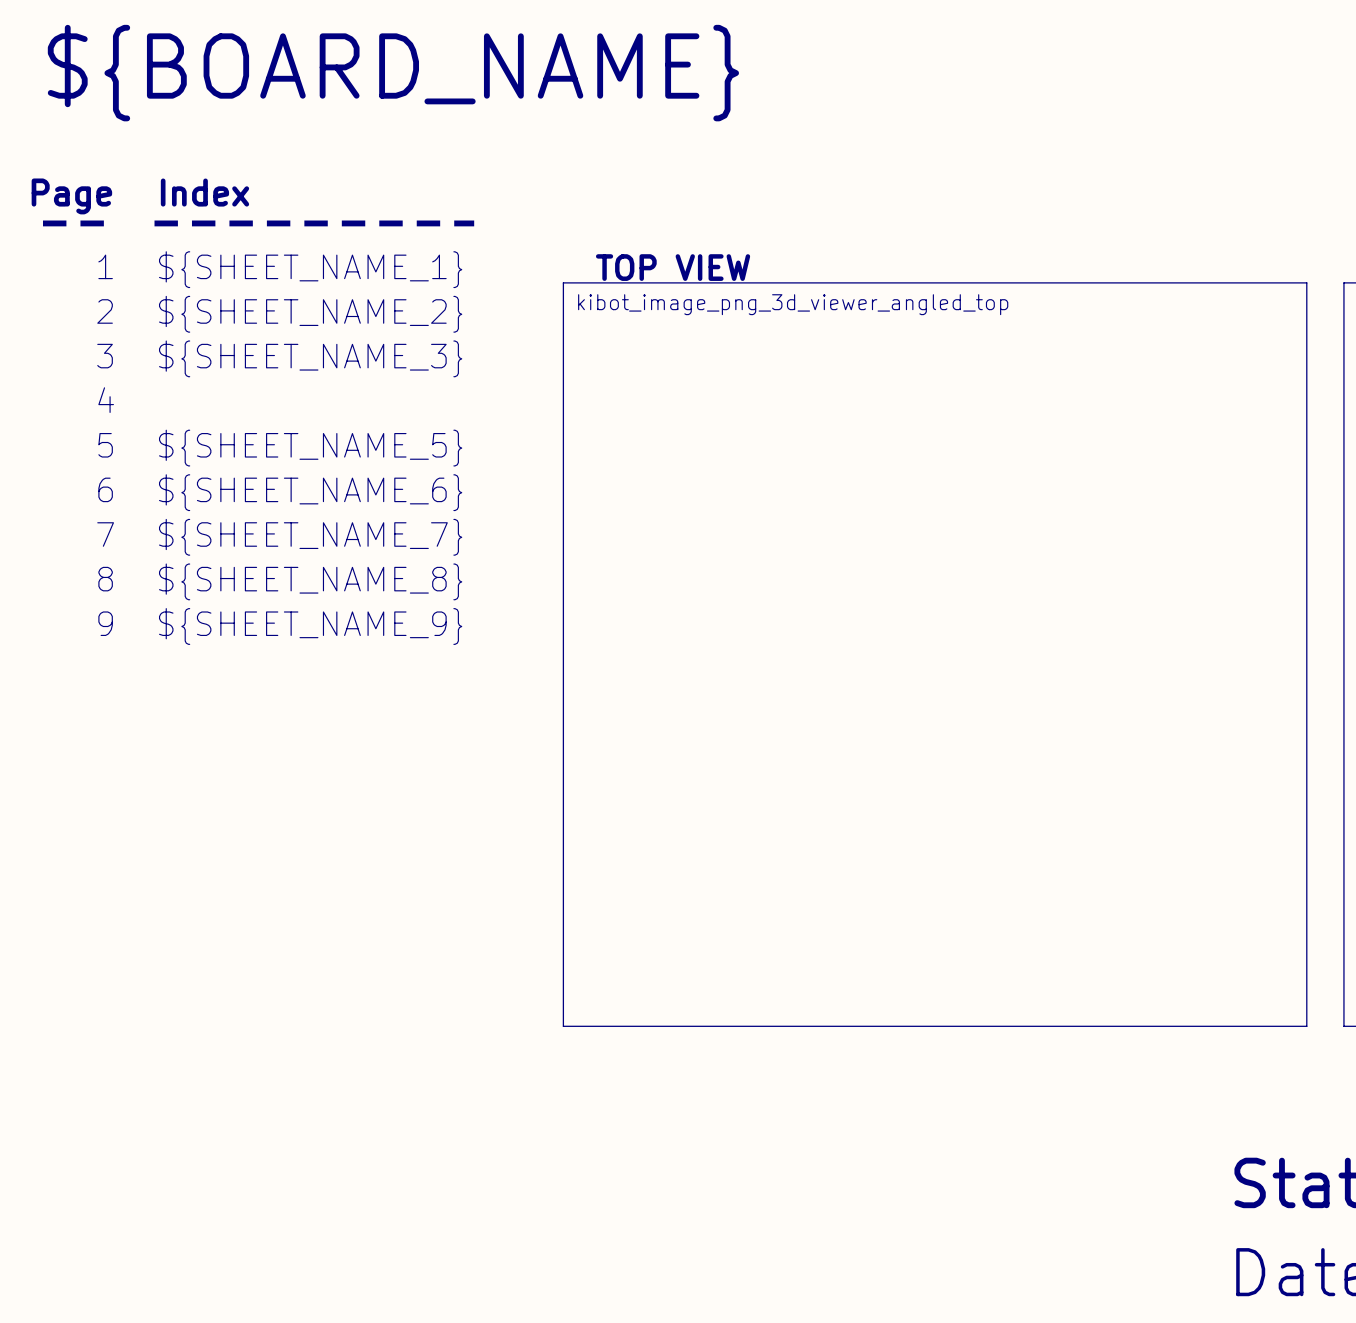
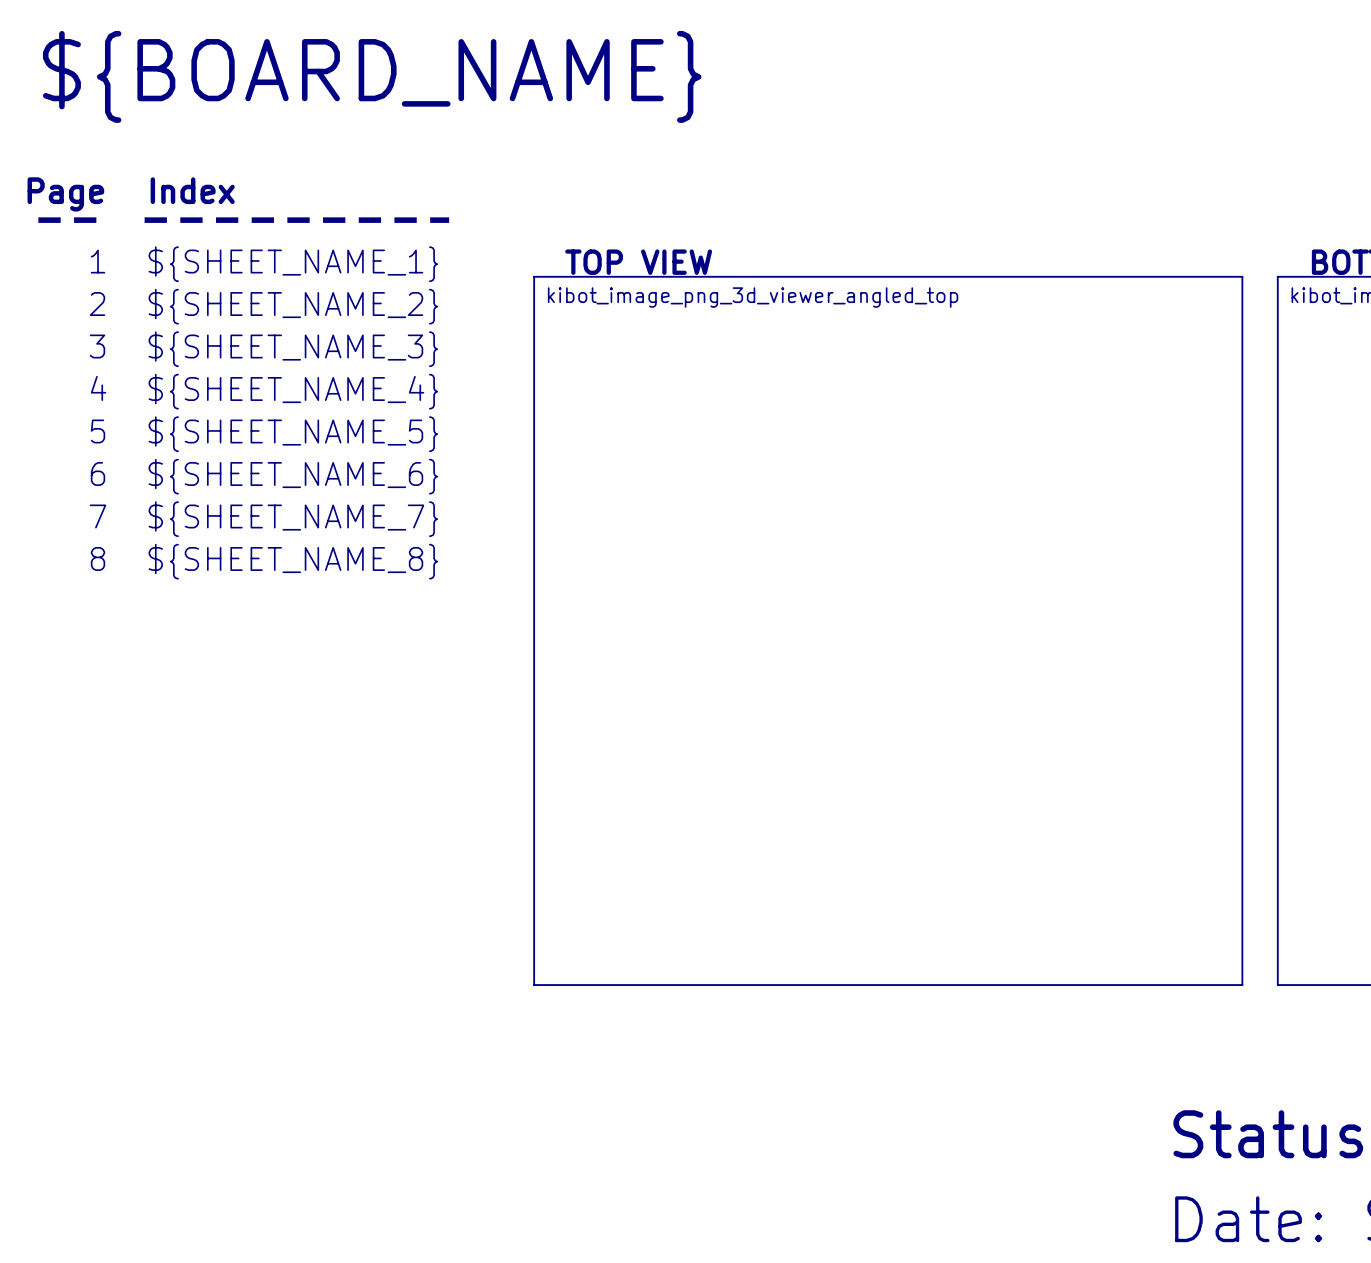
text: none -> ${SHEET_NAME_4} (293, 391)
text: 9 (105, 623) -> none
text: ${SHEET_NAME_9} (310, 626) -> none

